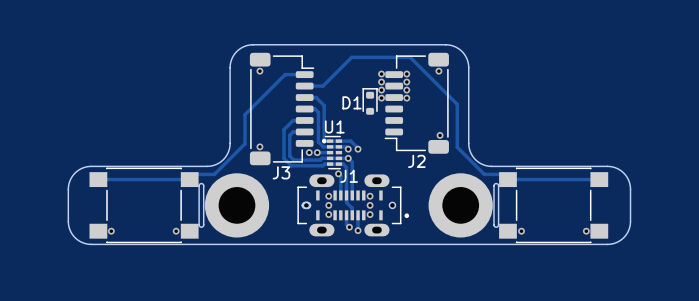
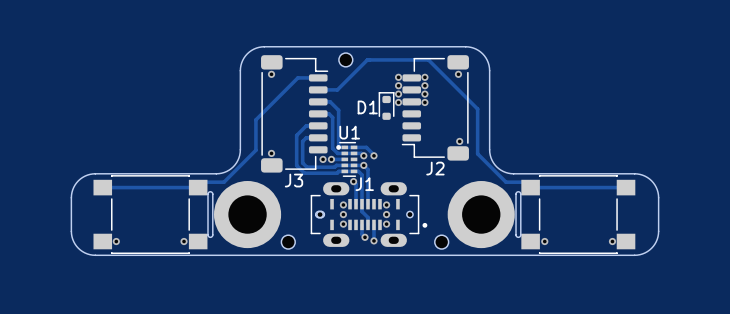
part: none -> (345, 59)
part: none -> (288, 242)
part: none -> (441, 242)

